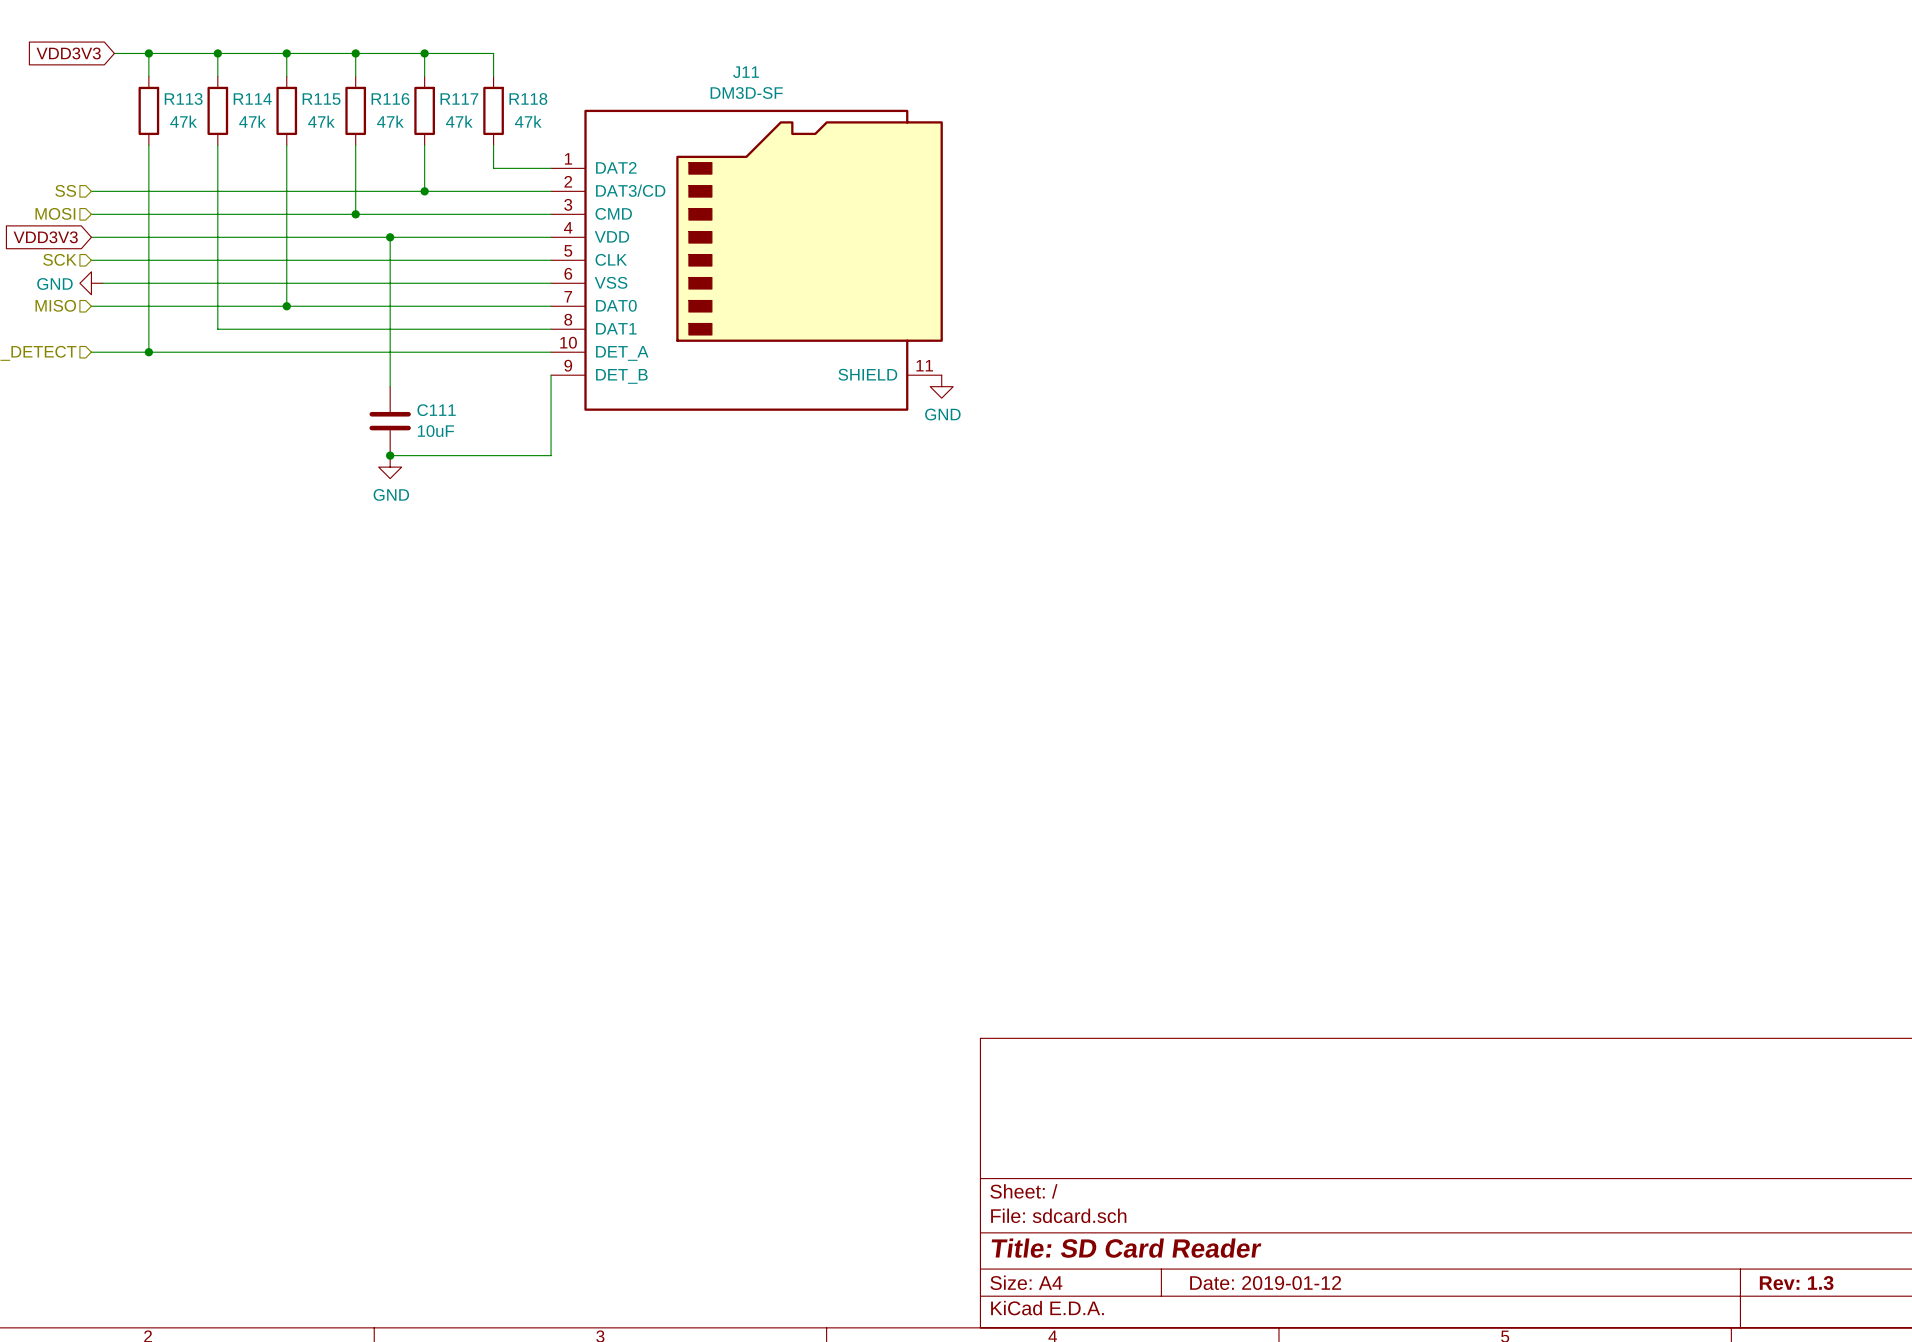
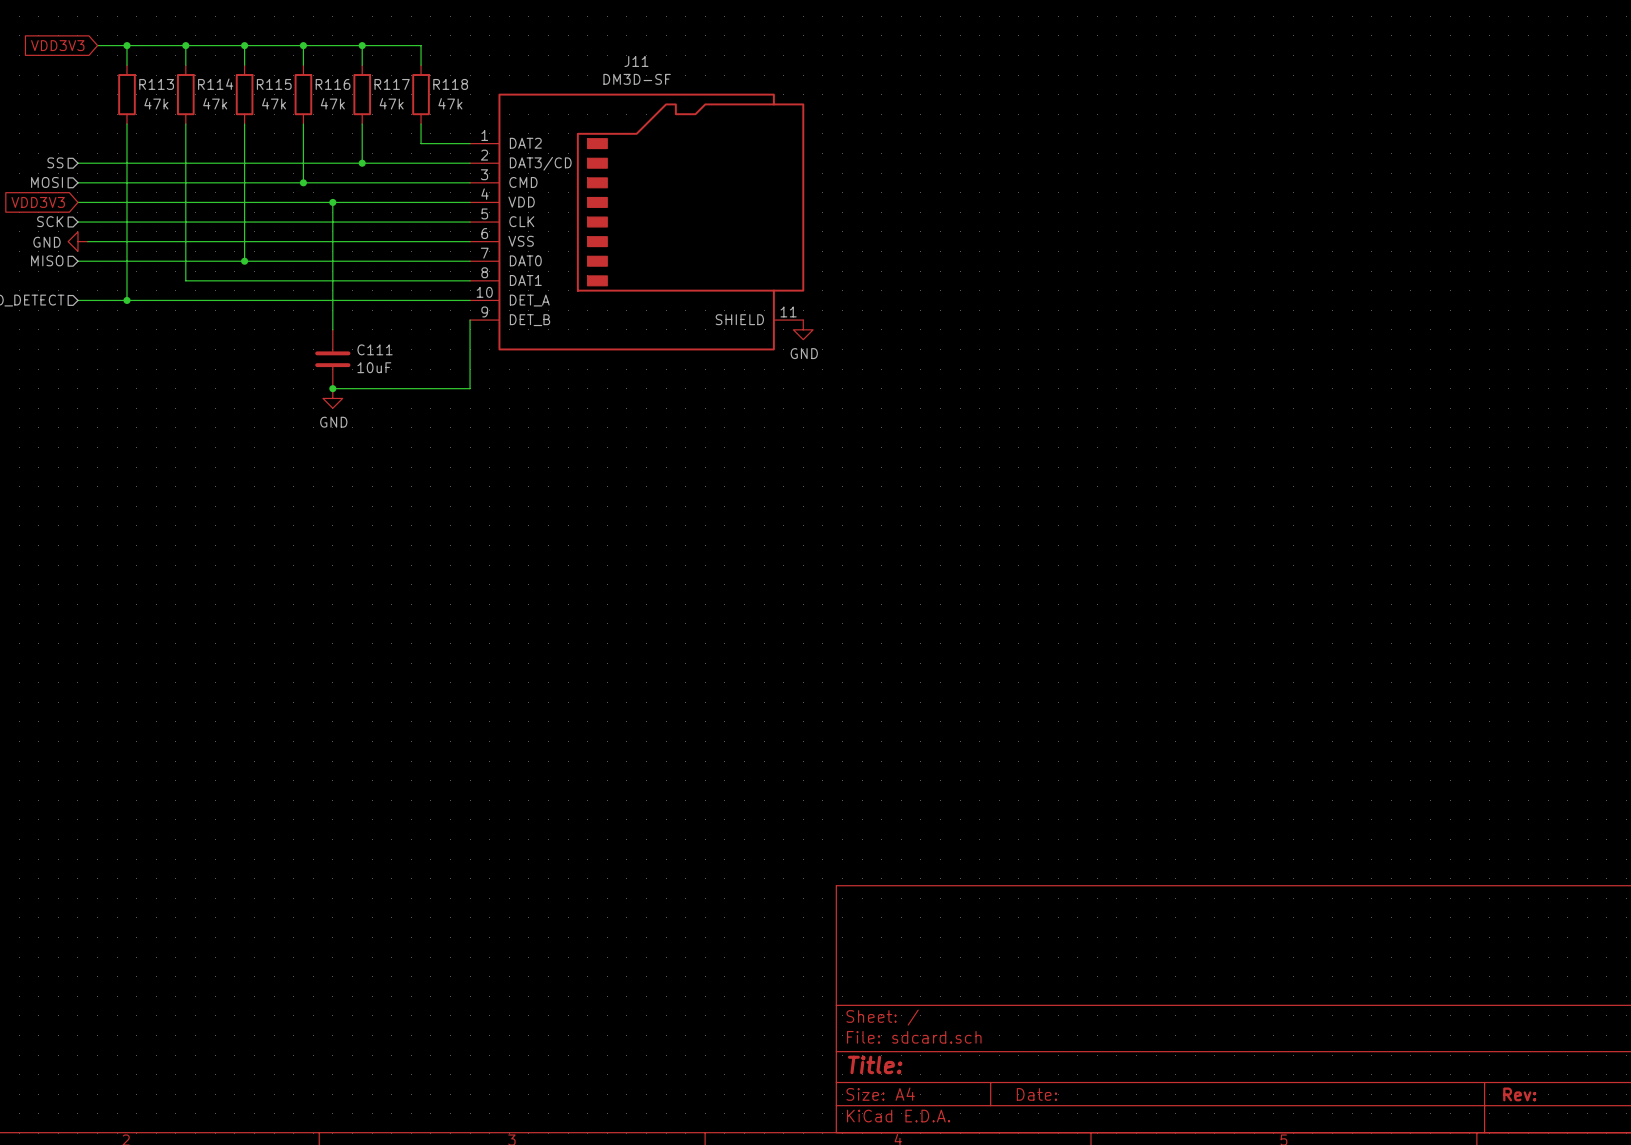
title block: Title: SD Card Reader (1126, 1248) -> Title: (875, 1064)
title block: Date: 2019-01-12 (1265, 1283) -> Date: (1036, 1094)
title block: Rev: 1.3 (1796, 1283) -> Rev: (1519, 1094)

